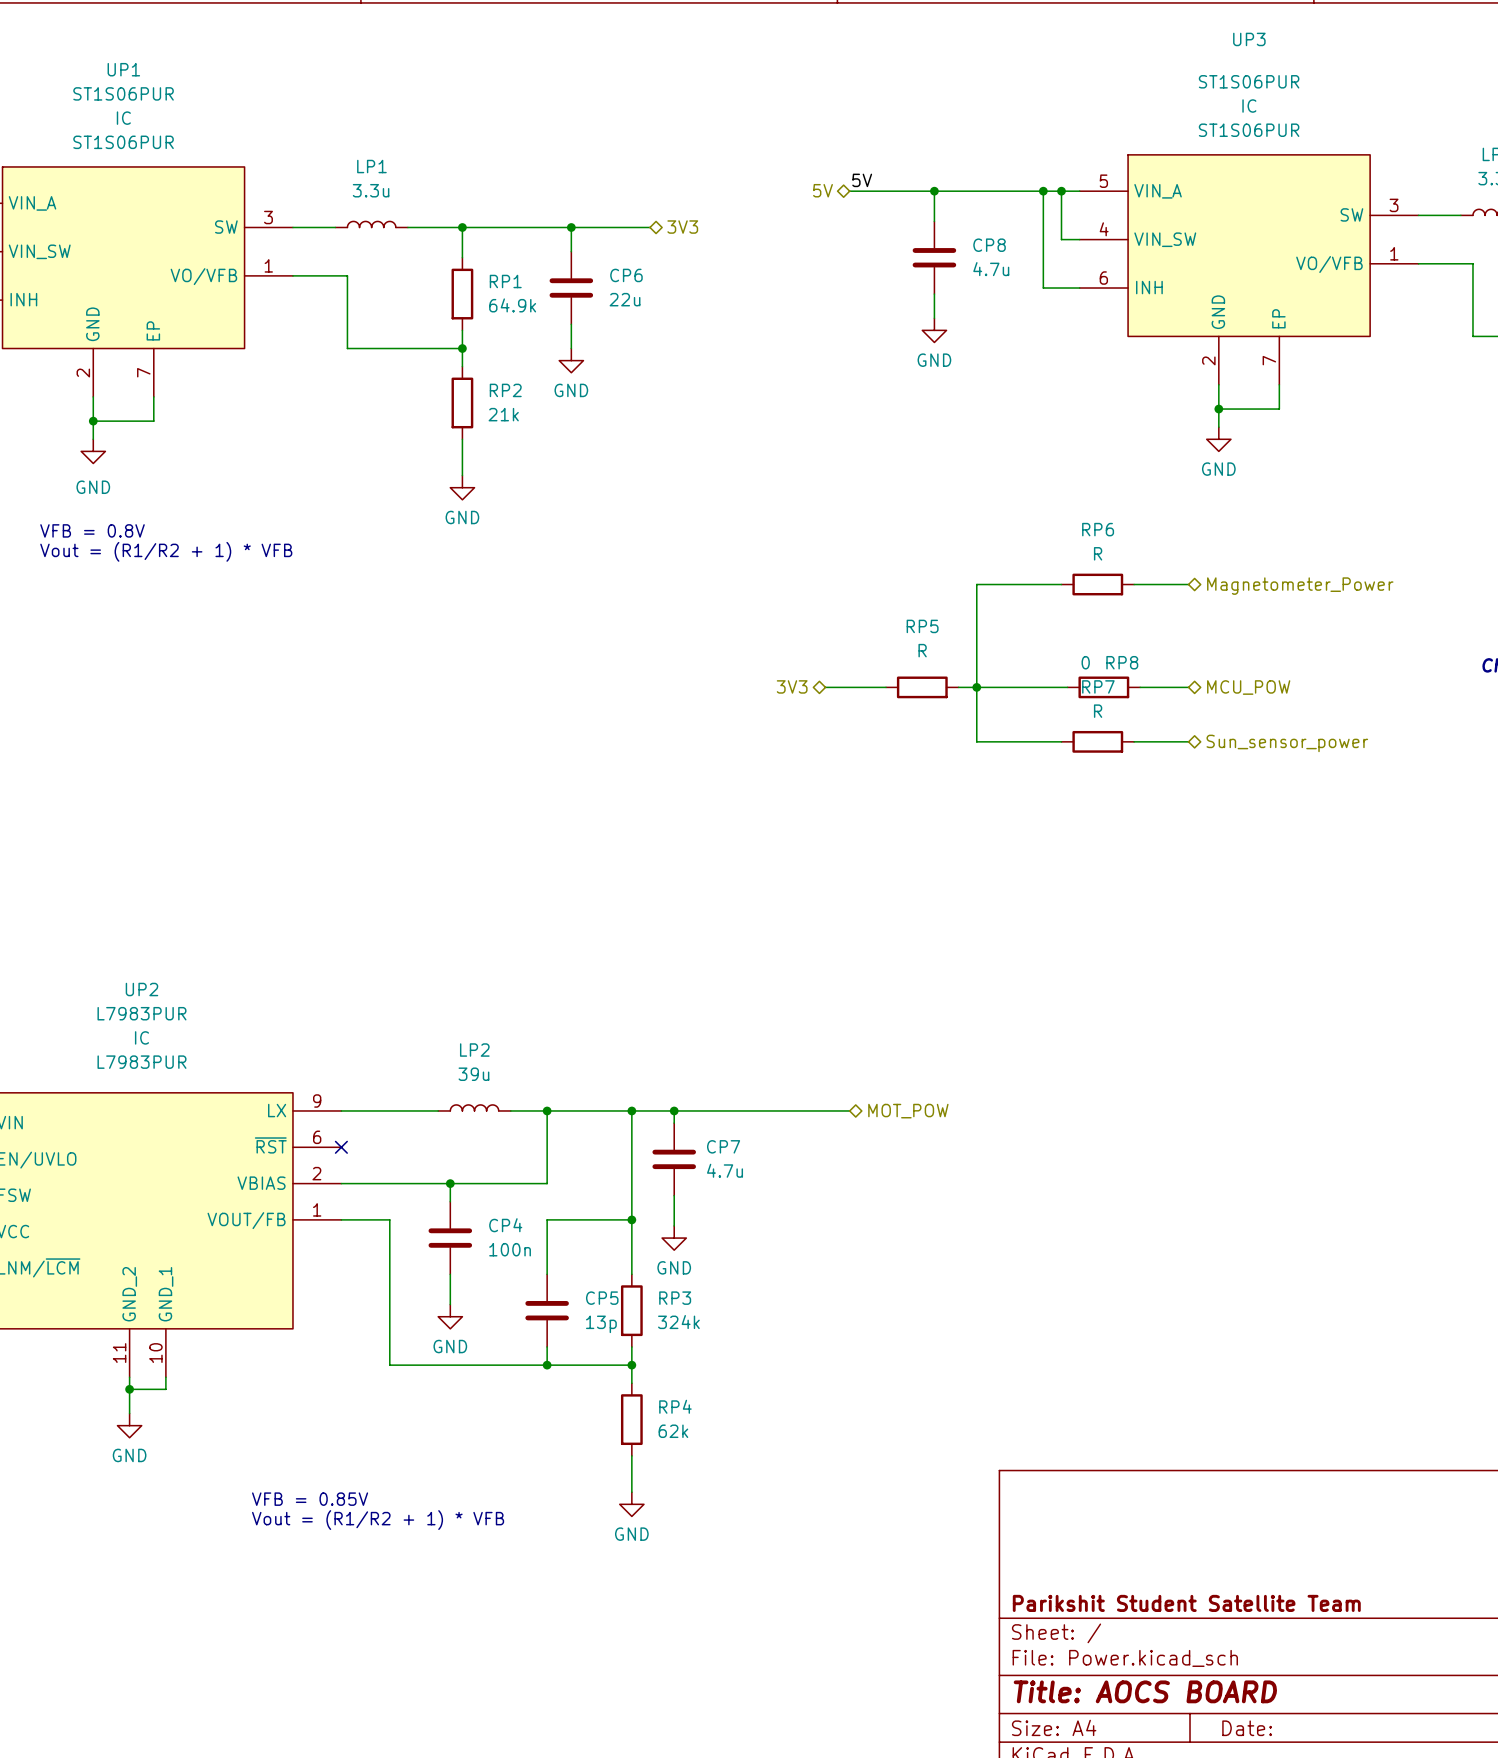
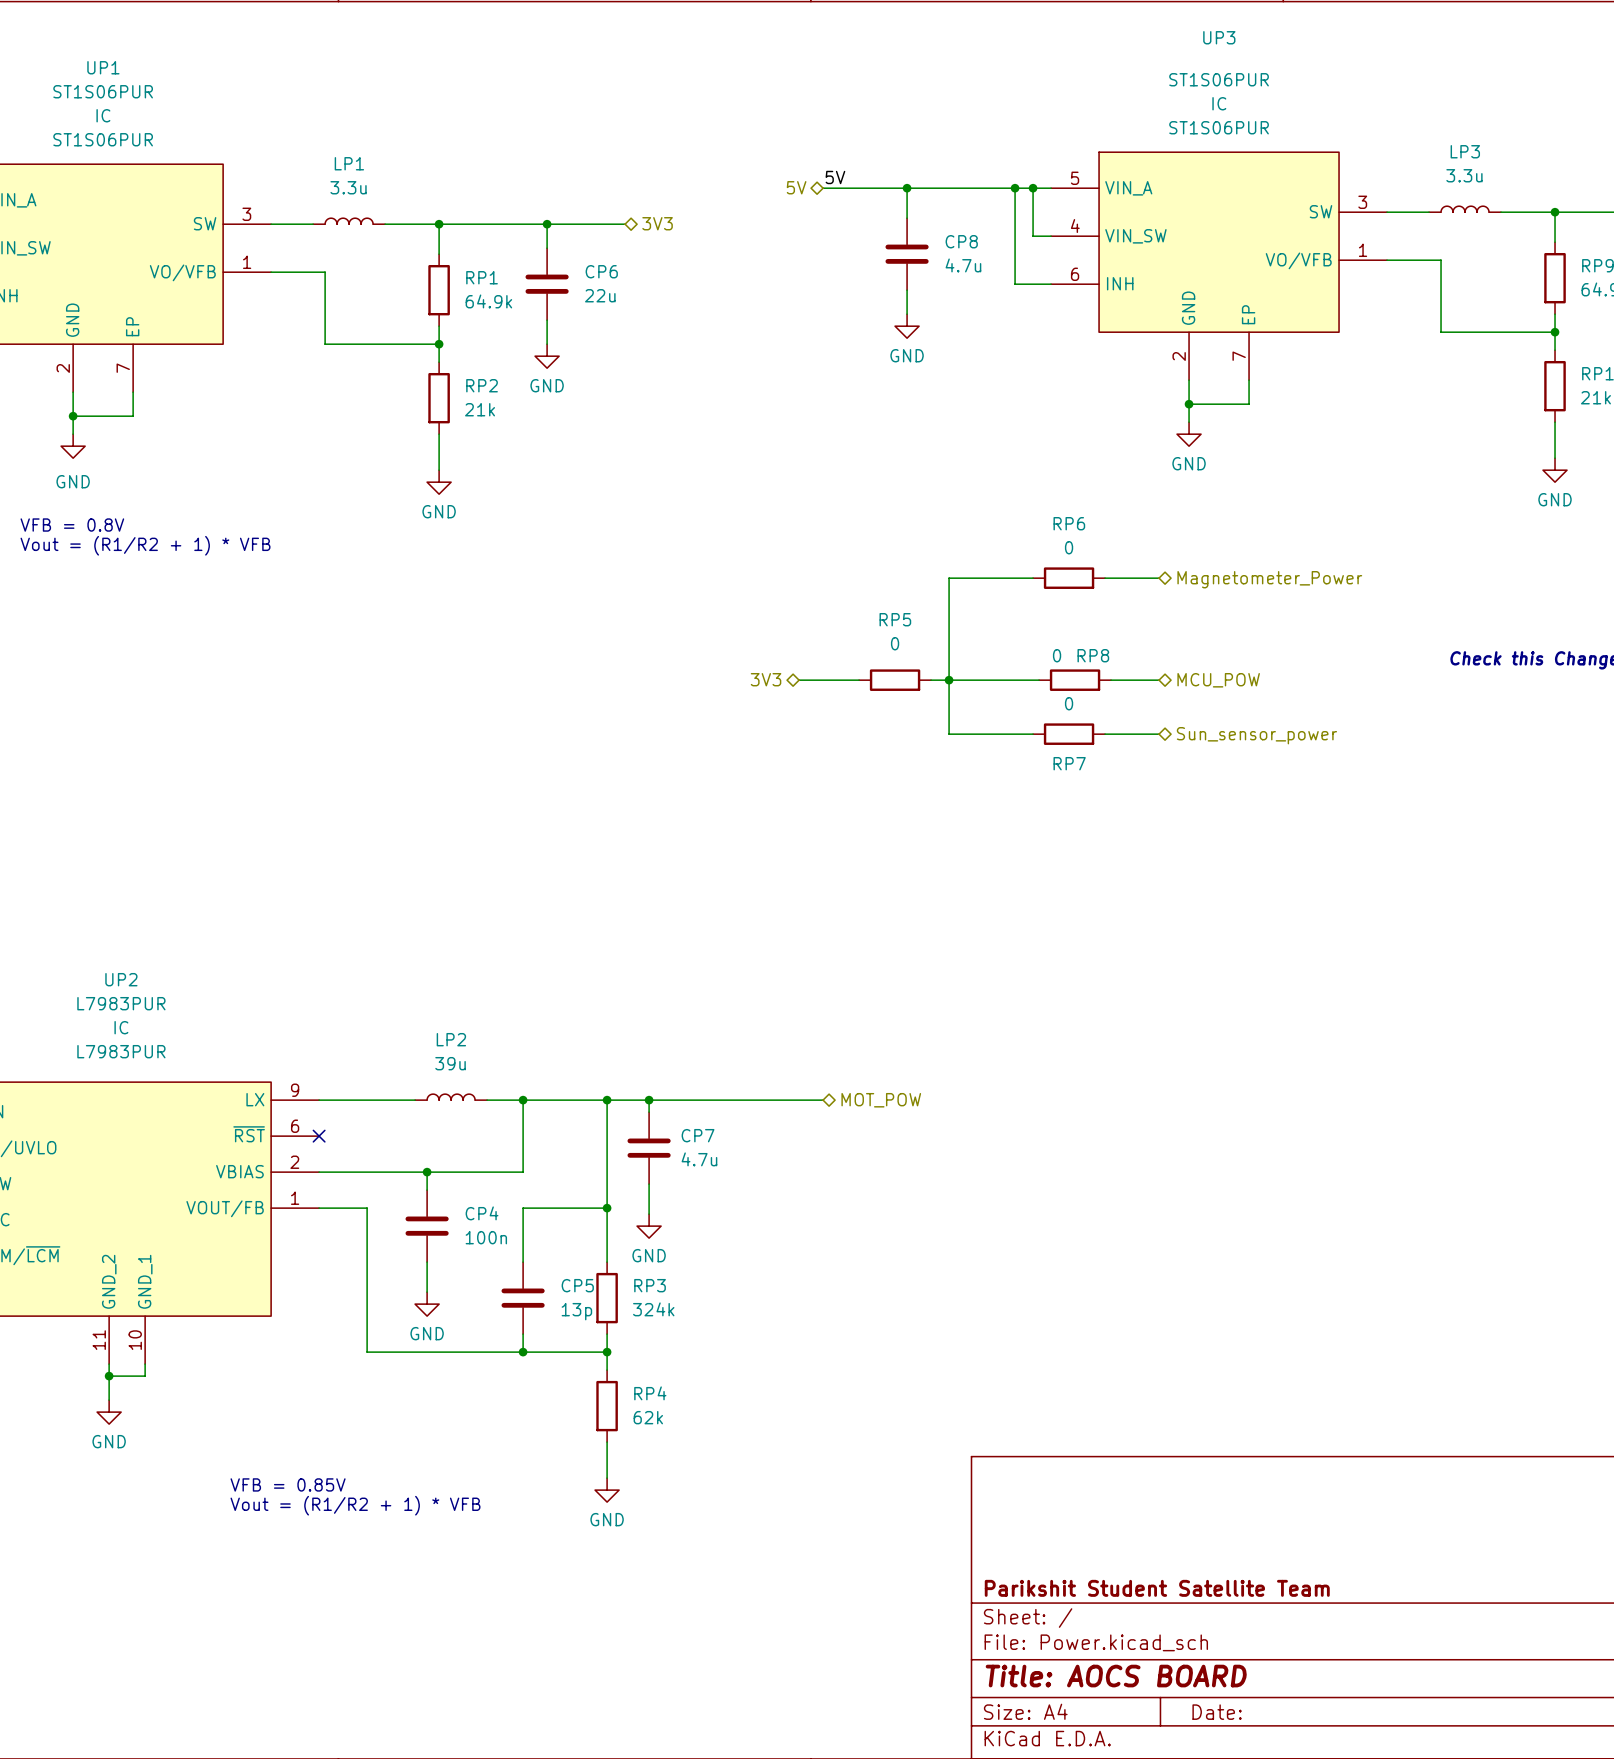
RP6 value: R (1098, 553) -> 0 (1069, 547)
RP5 value: R (922, 650) -> 0 (895, 643)
RP7 name position: RP7 (1098, 686) -> RP7 (1069, 763)
RP7 value: R (1098, 711) -> 0 (1069, 703)

